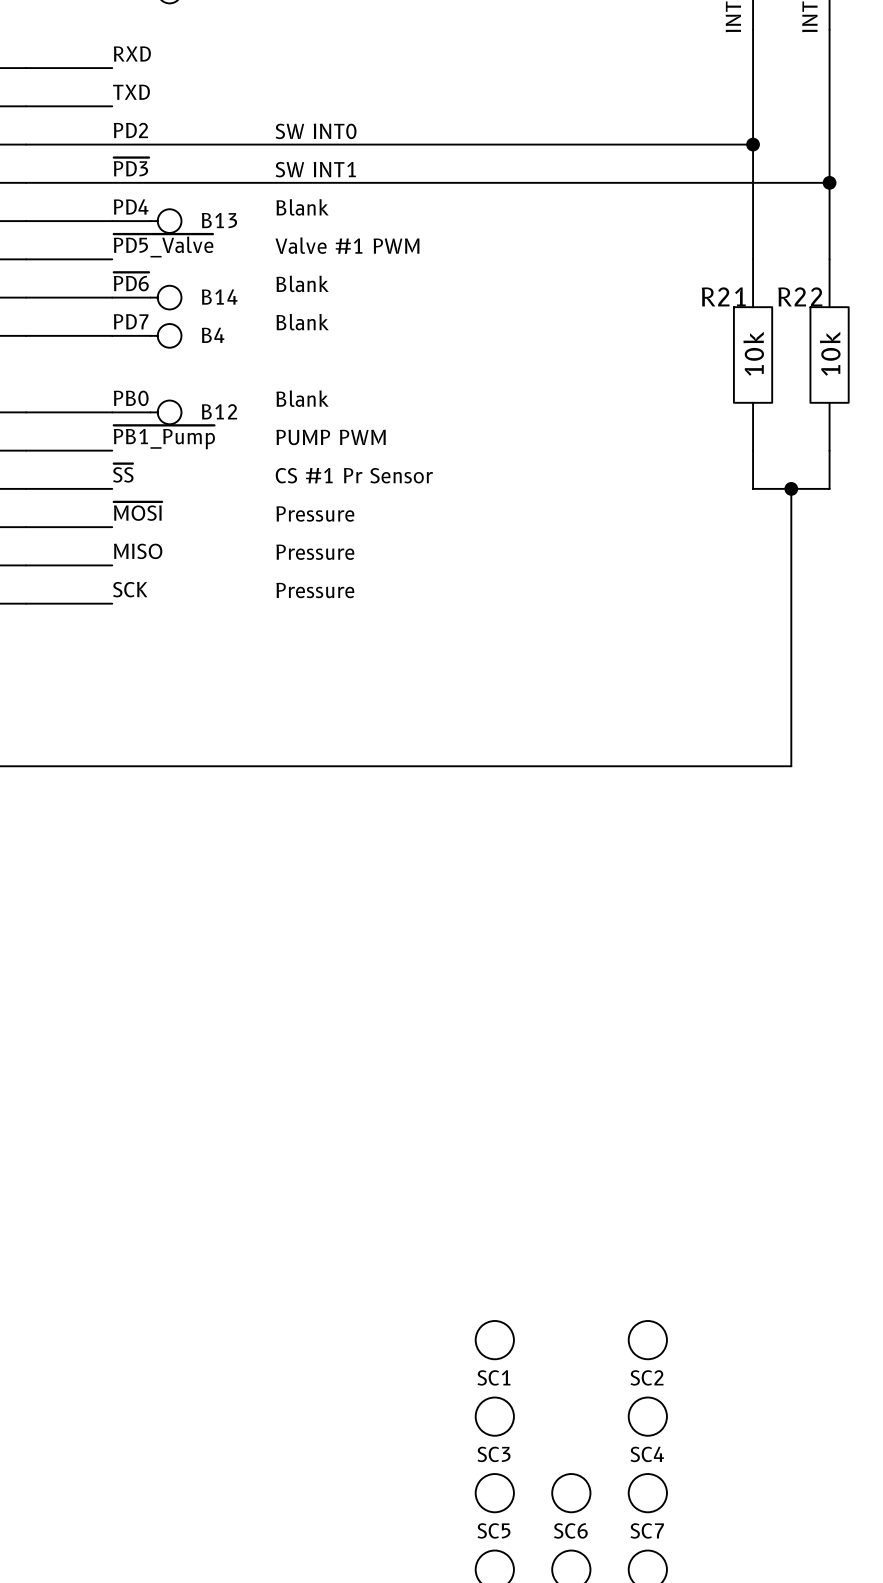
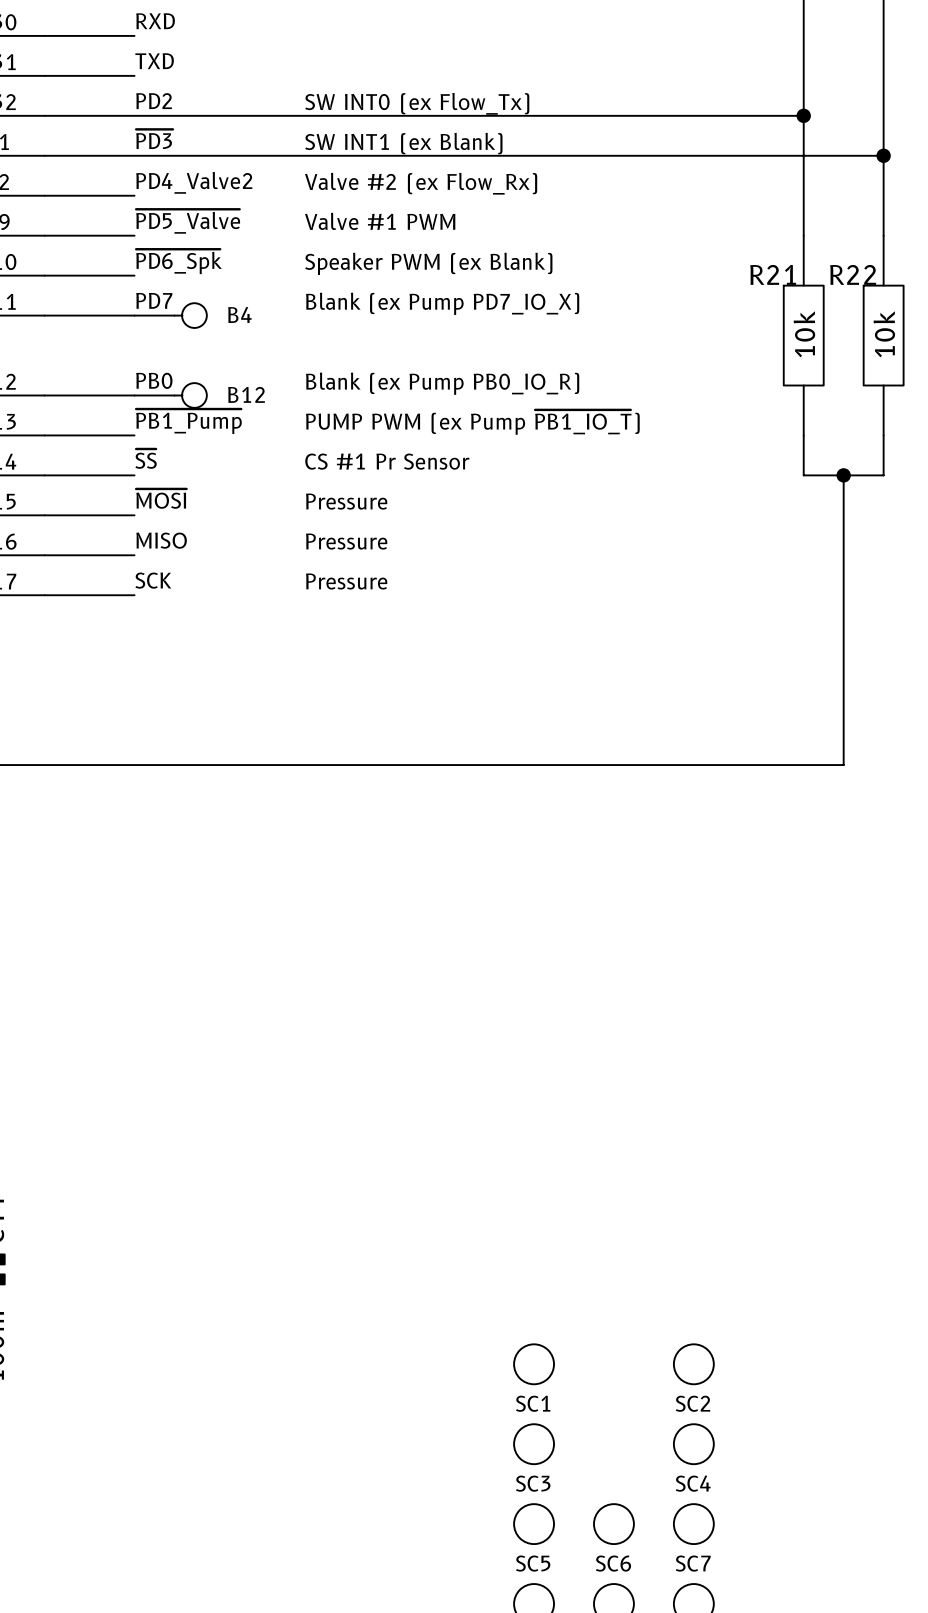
text: SW INT0 (316, 131) -> SW INT0 (ex Flow_Tx) (417, 103)
text: SW INT1 (315, 169) -> SW INT1 (ex Blank) (403, 143)
label: PD4 (131, 206) -> PD4_Valve2 (194, 182)
text: Blank (302, 207) -> Valve #2 (ex Flow_Rx) (421, 183)
B13: (146, 221) -> none
label: ~{PD6} (131, 281) -> ~{PD6_Spk} (178, 261)
text: Blank (302, 283) -> Speaker PWM (ex Blank) (428, 263)
B14: (146, 297) -> none
text: Blank (302, 322) -> Blank (ex Pump PD7_IO_X) (442, 303)
text: Blank (302, 398) -> Blank (ex Pump PB0_IO_R) (442, 383)
text: PUMP PWM (331, 437) -> PUMP PWM (ex Pump ~{PB1_IO_T}) (472, 422)

